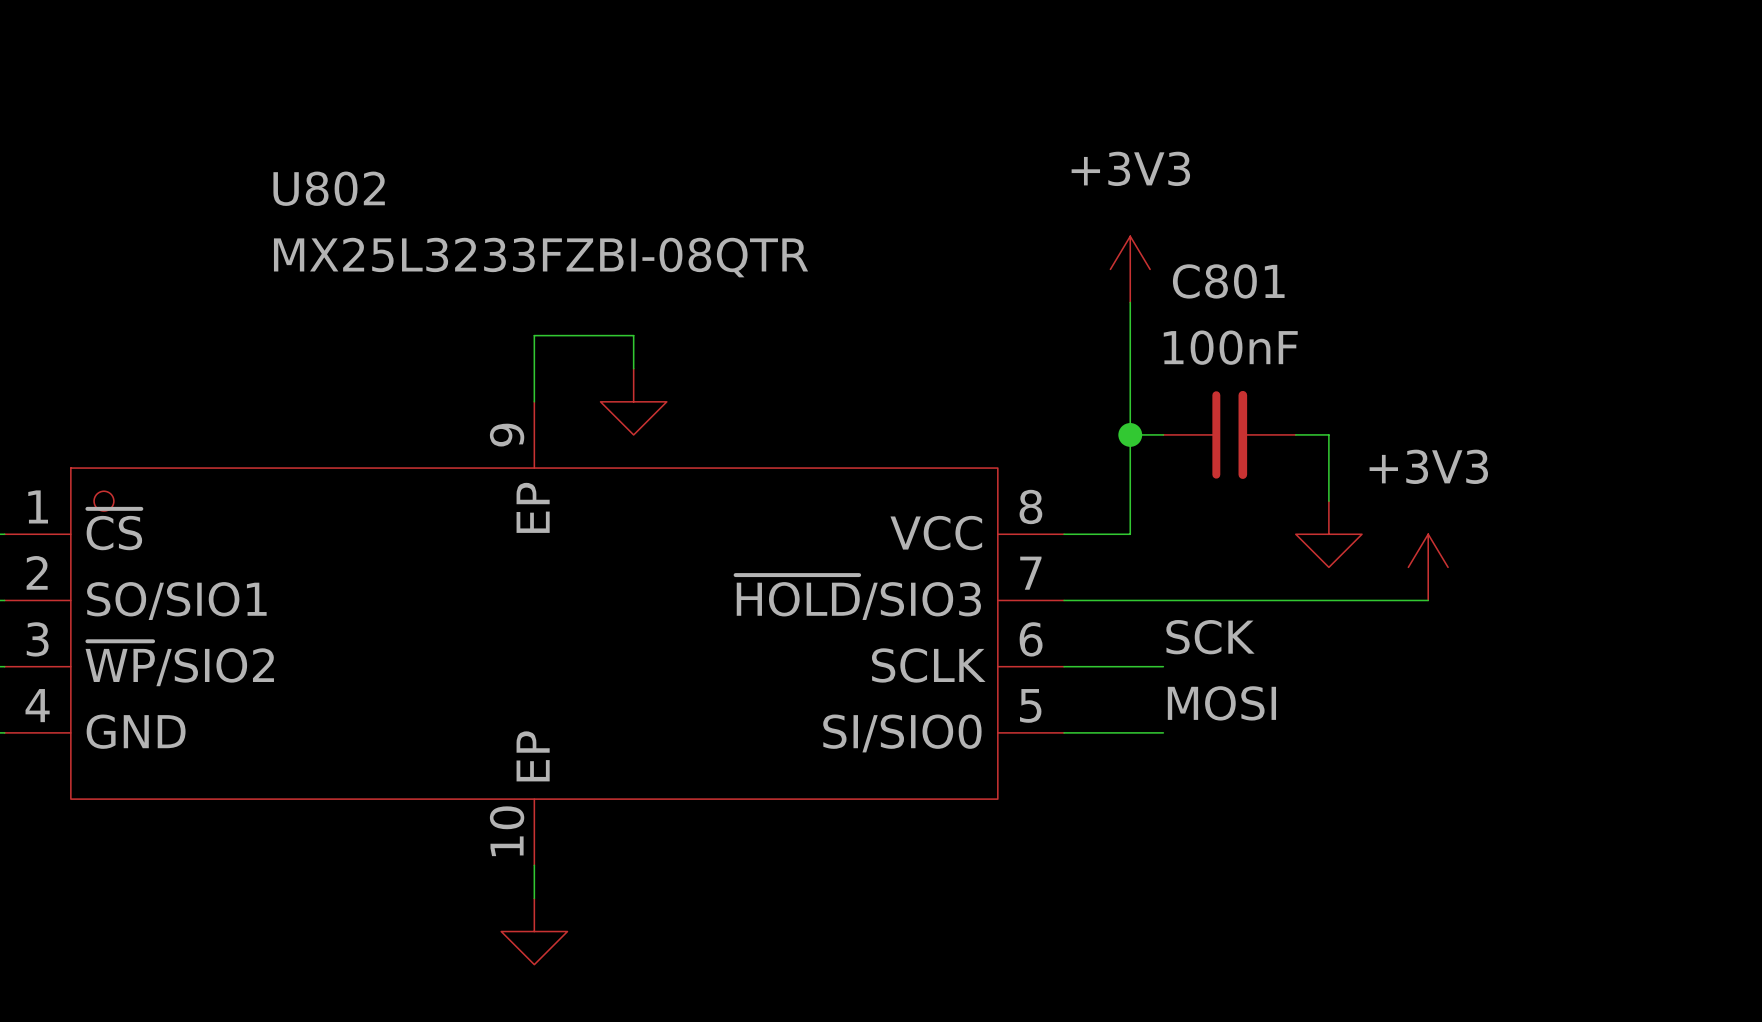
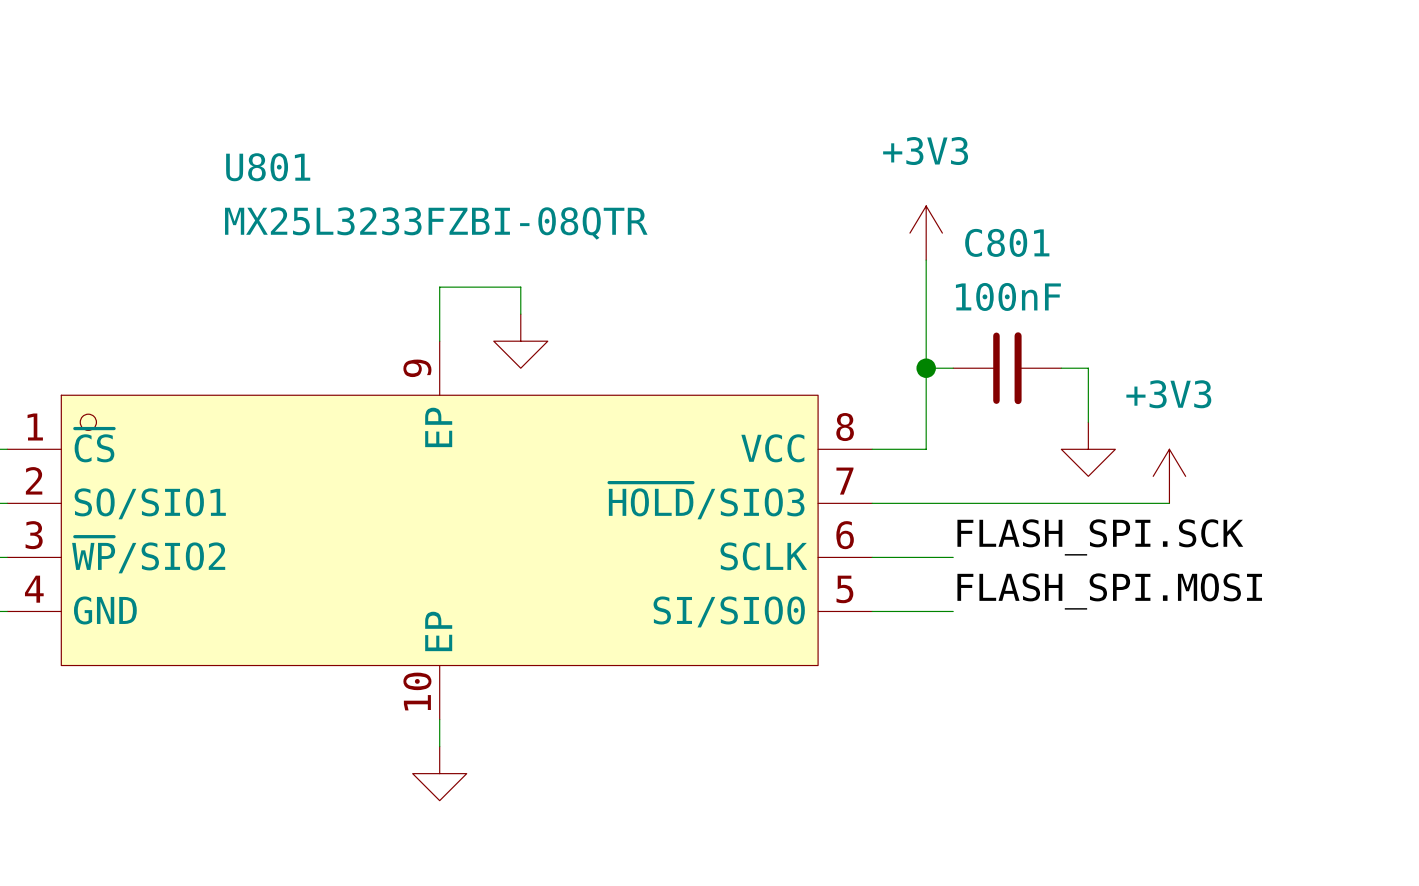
U802 name: U802 (329, 188) -> U801 (268, 167)
label: SCK (1210, 637) -> FLASH_SPI.SCK (1100, 537)
label: MOSI (1221, 703) -> FLASH_SPI.MOSI (1109, 591)

